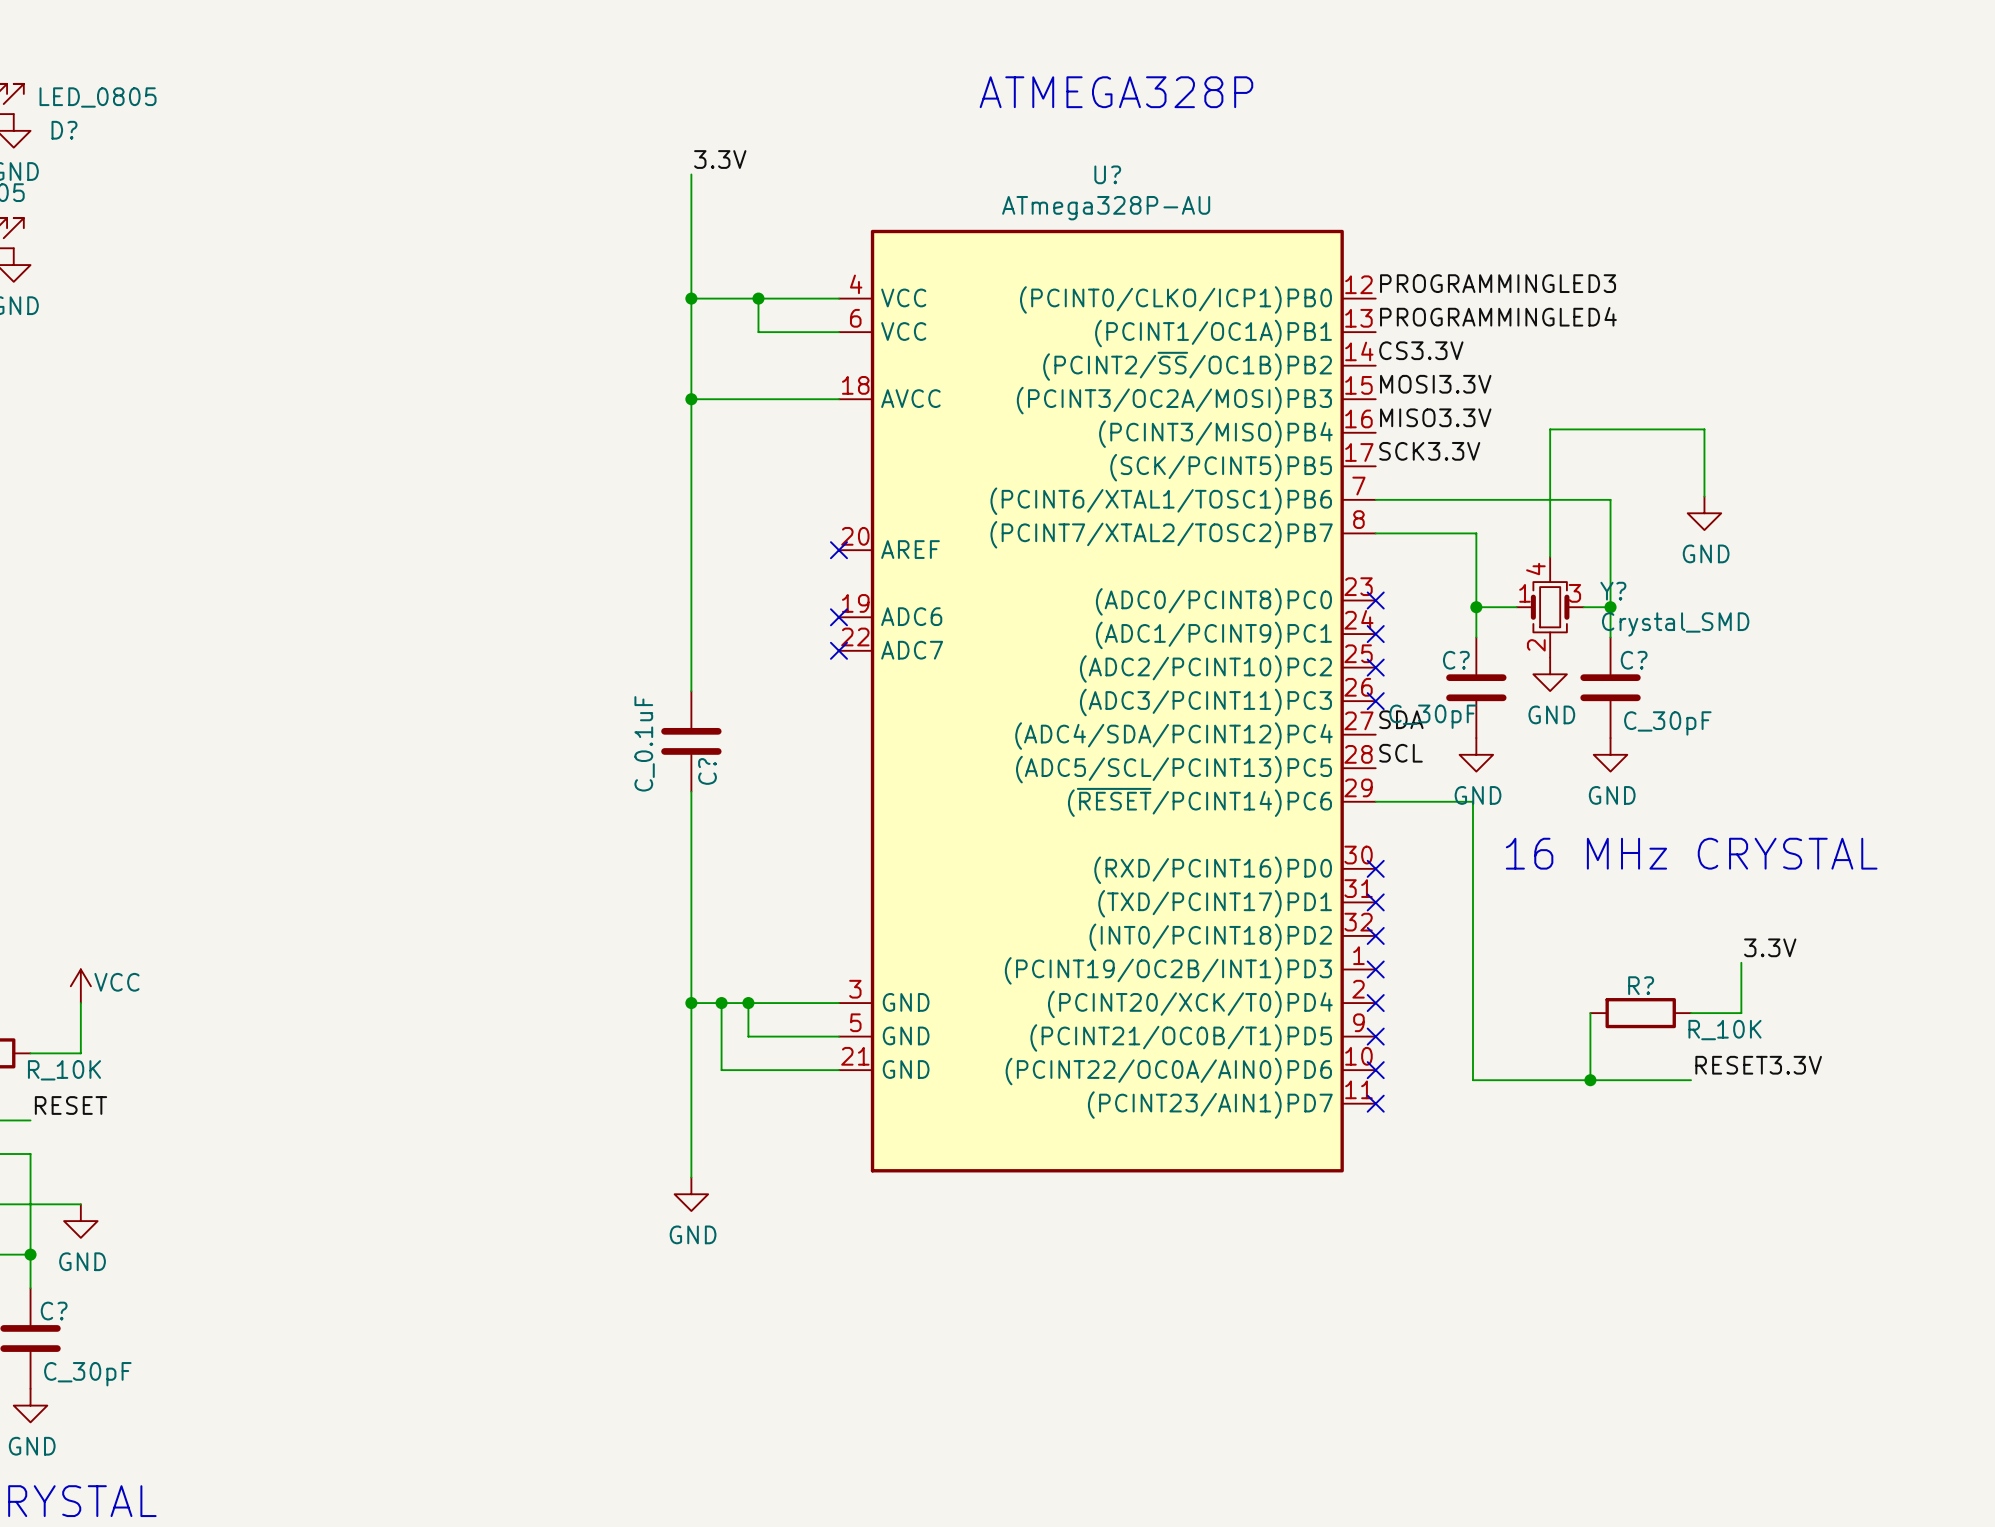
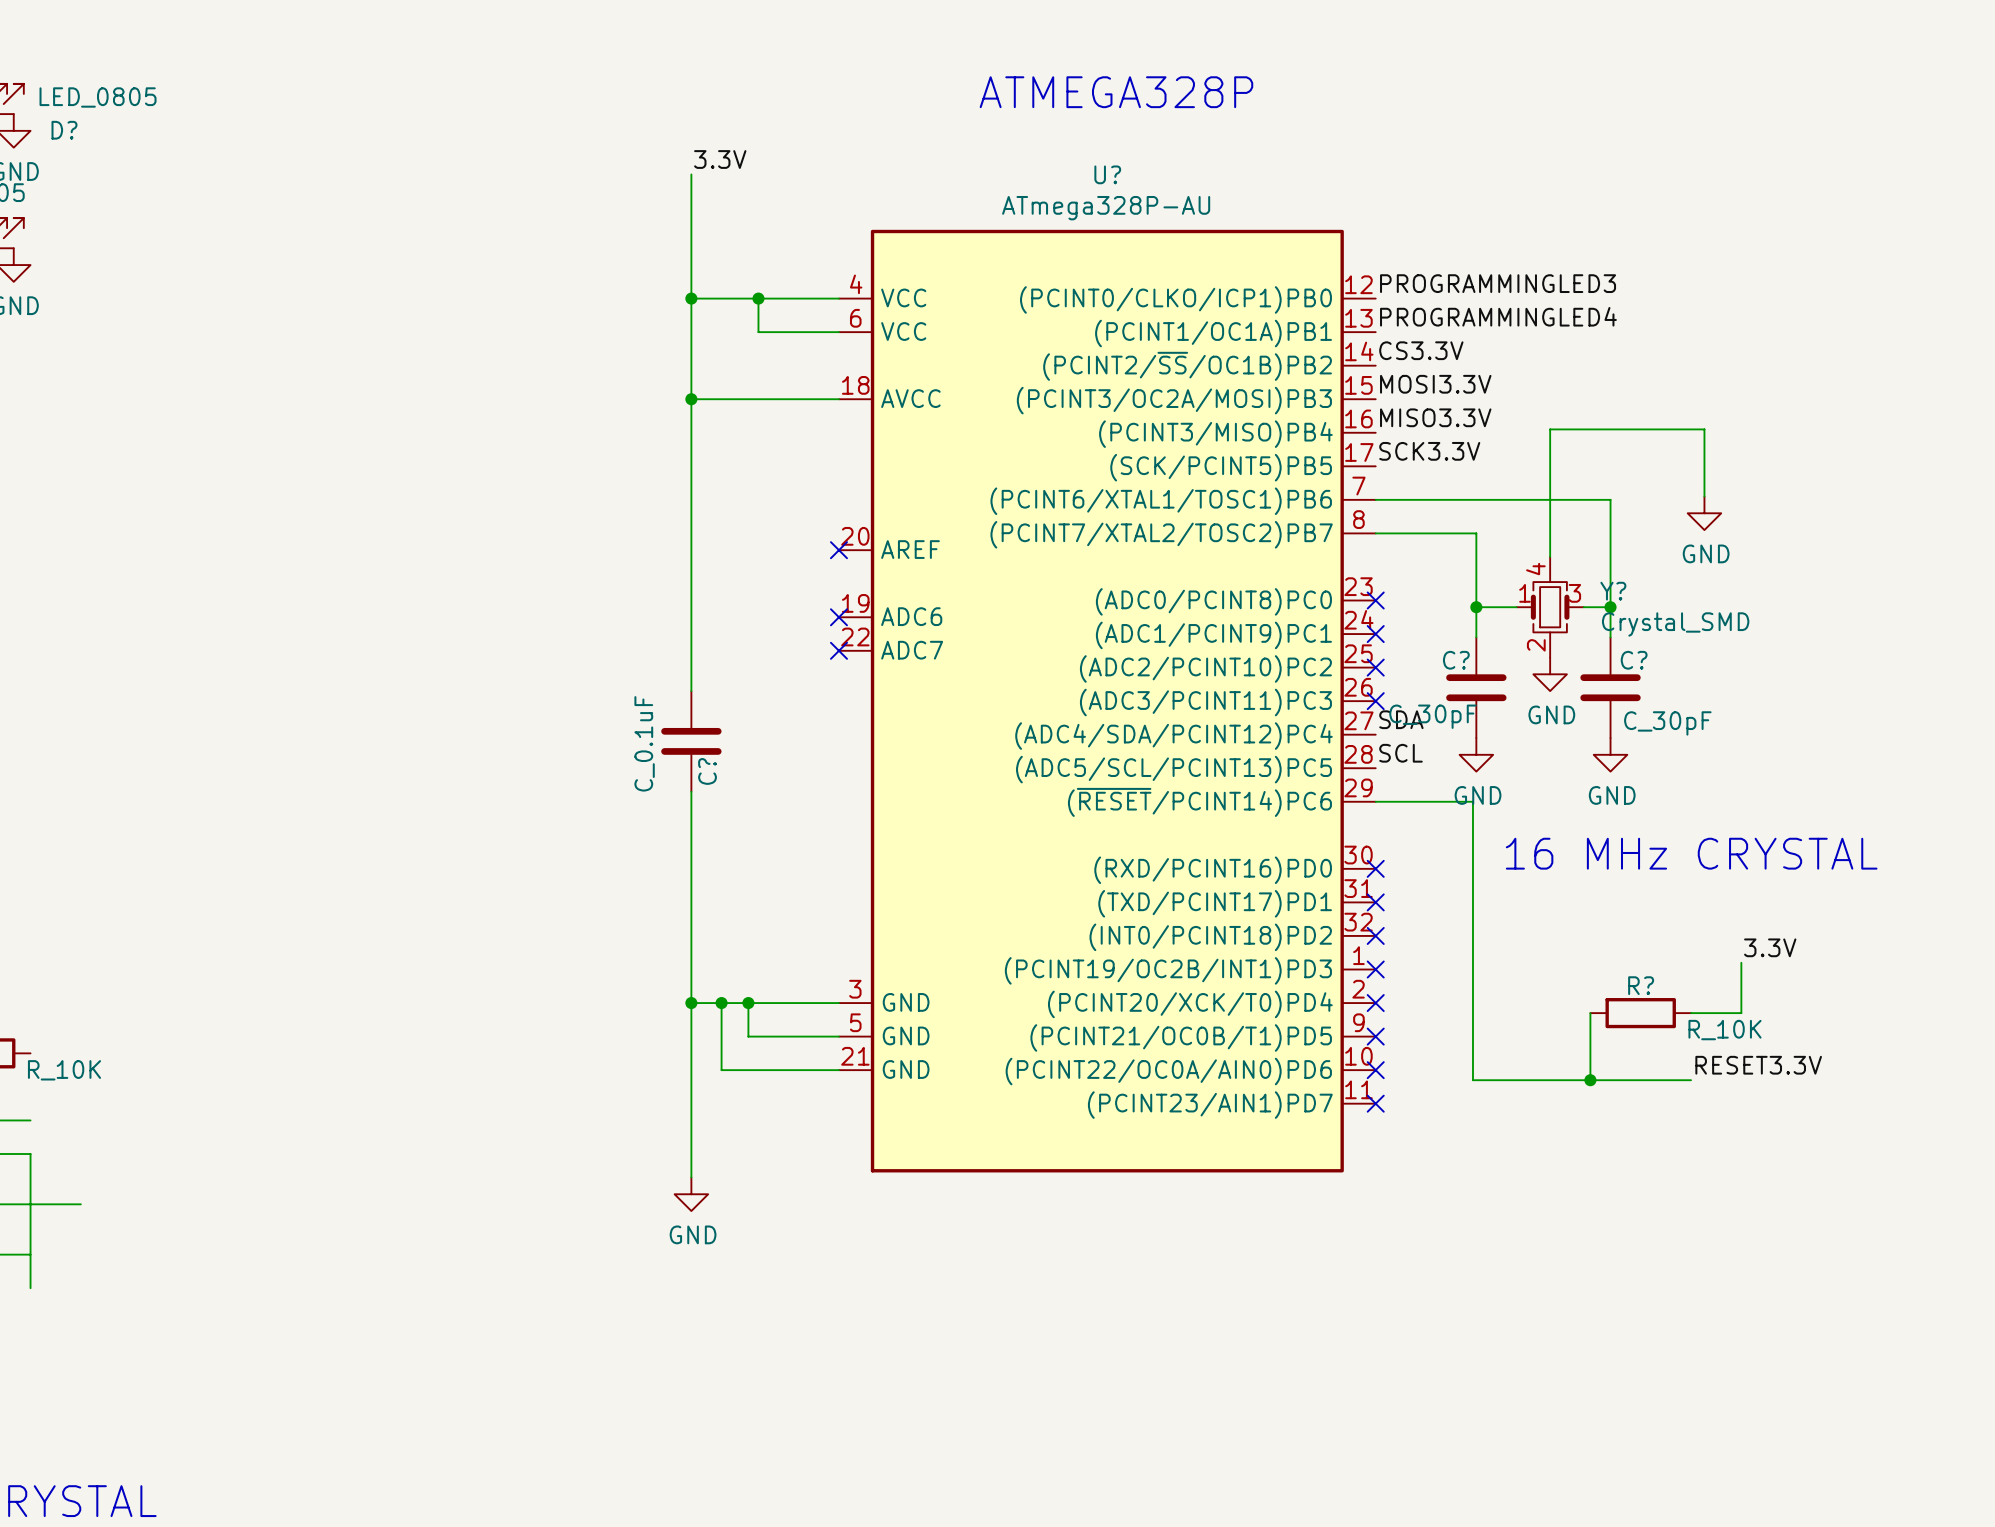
power symbol: VCC (80, 986) -> none
wire: (80, 1003) (80, 1053) (30, 1053) -> none
label: RESET (70, 1105) -> none
power symbol: GND (80, 1221) -> none
junction: (30, 1254) -> none
C?: C_30pF (30, 1338) -> none
power symbol: GND (30, 1405) -> none

